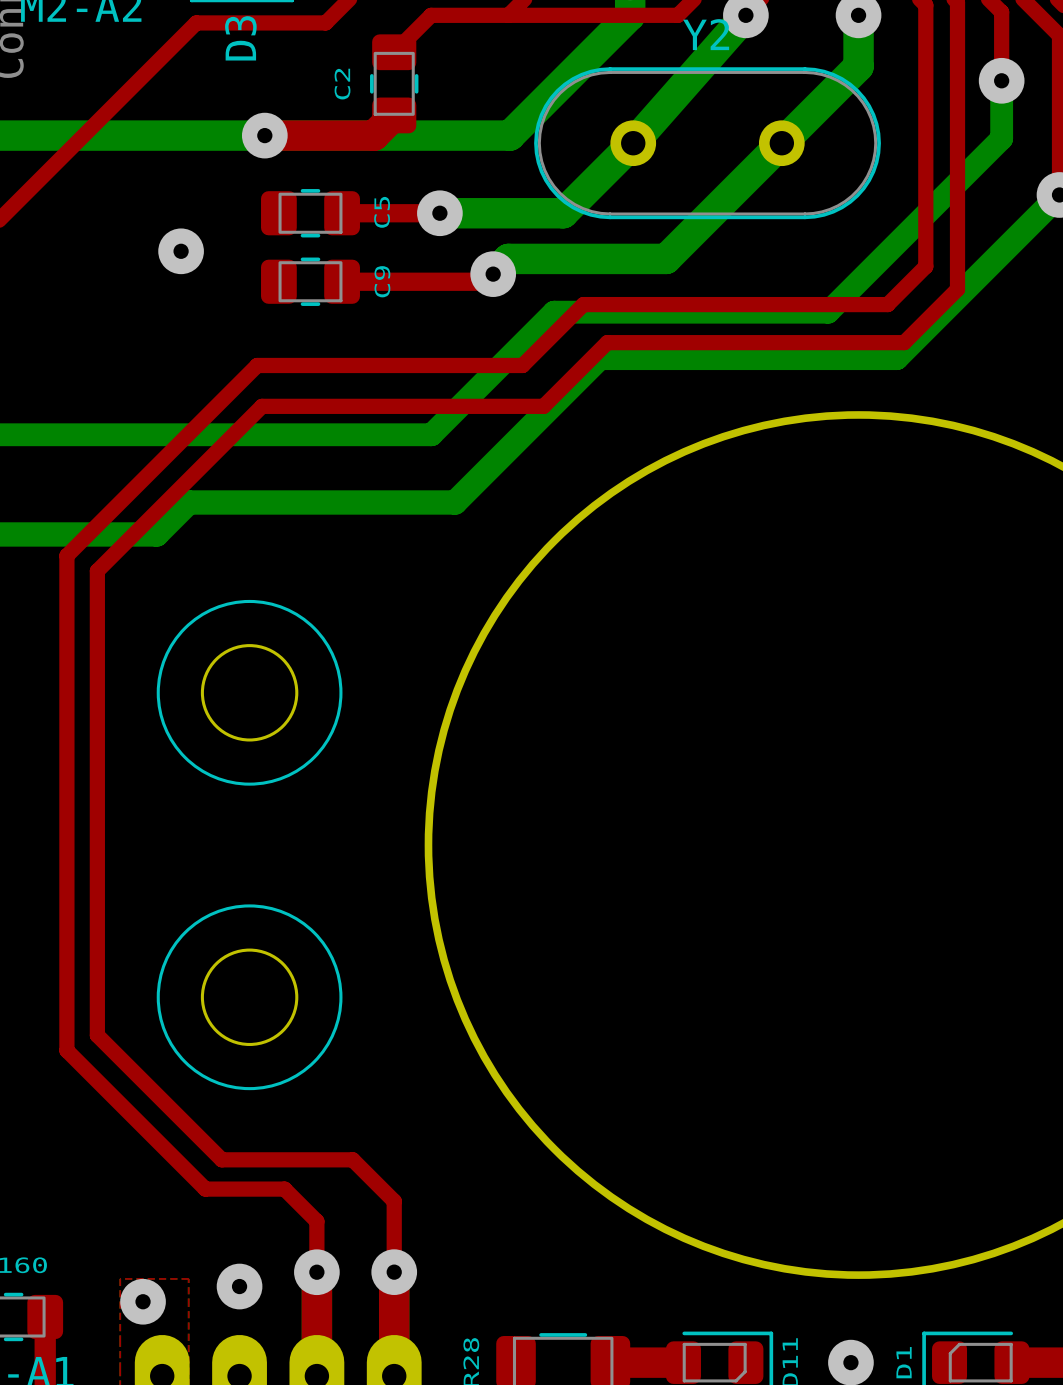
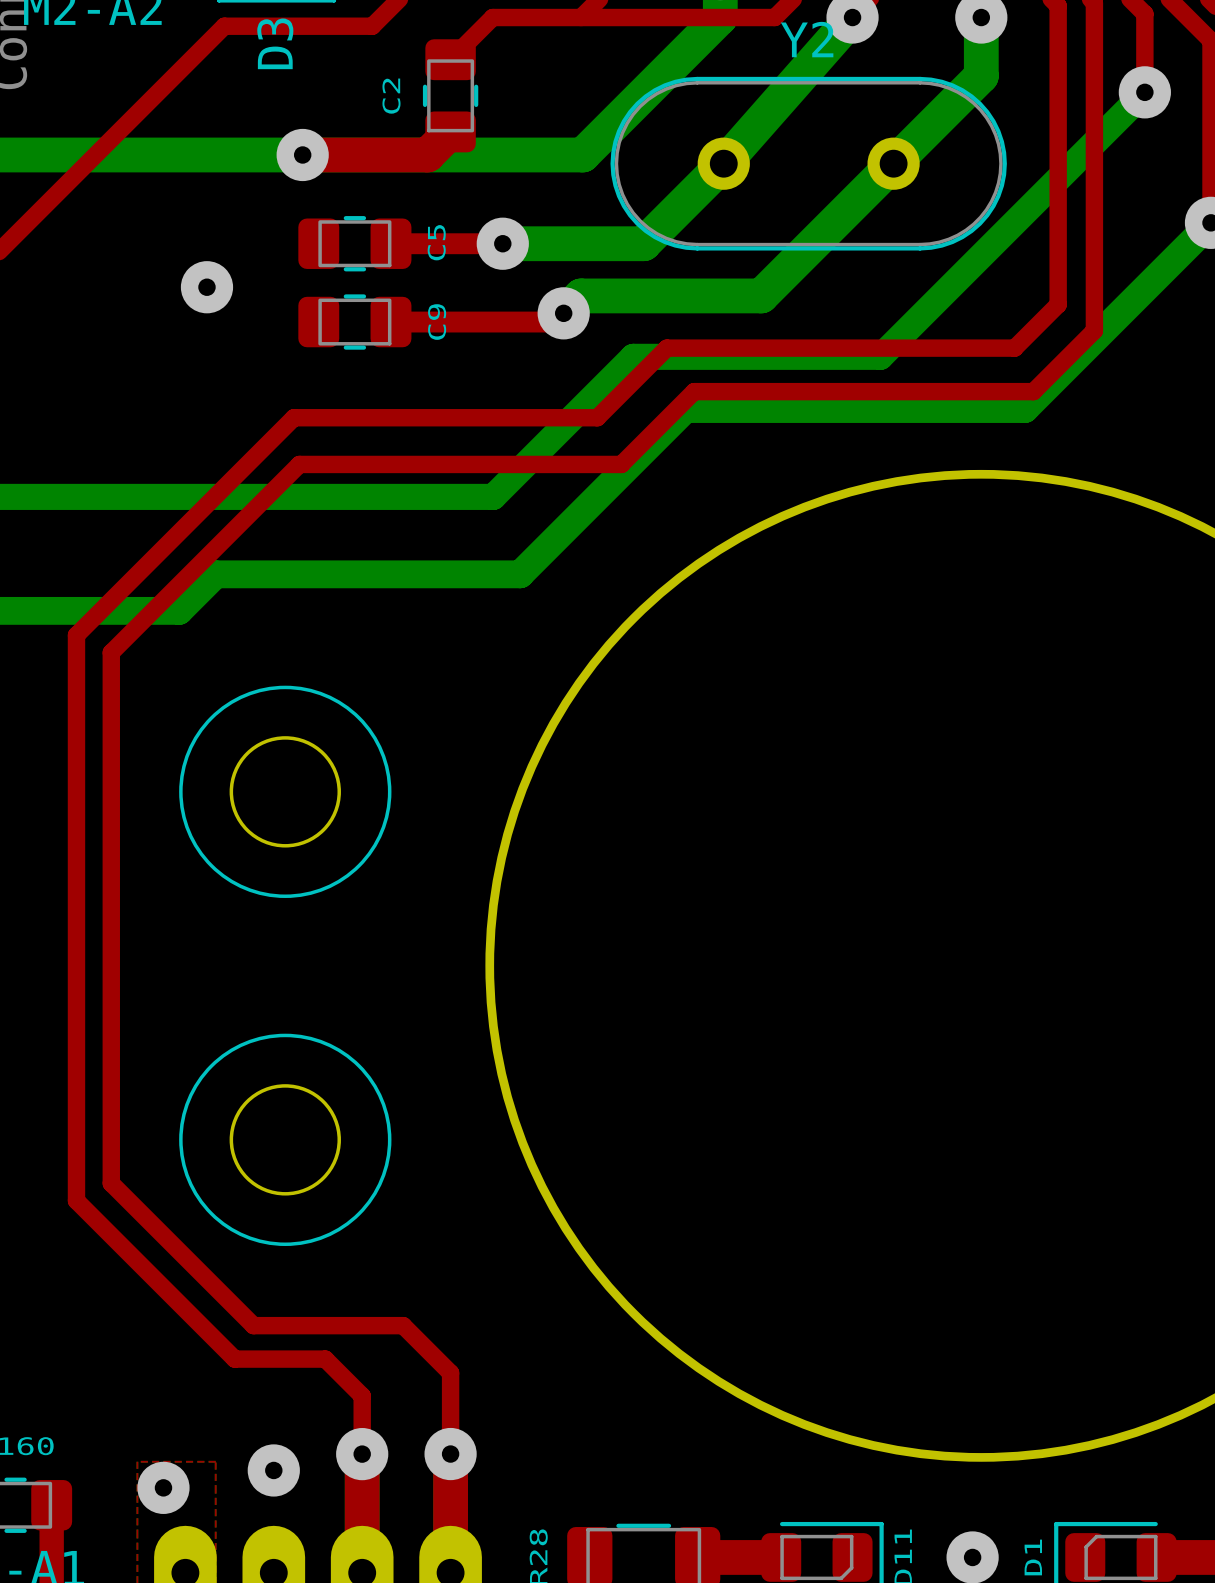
bottom track: (1001, 80) (1001, 138) (828, 312) (770, 312) -> (1144, 92) (880, 356)

